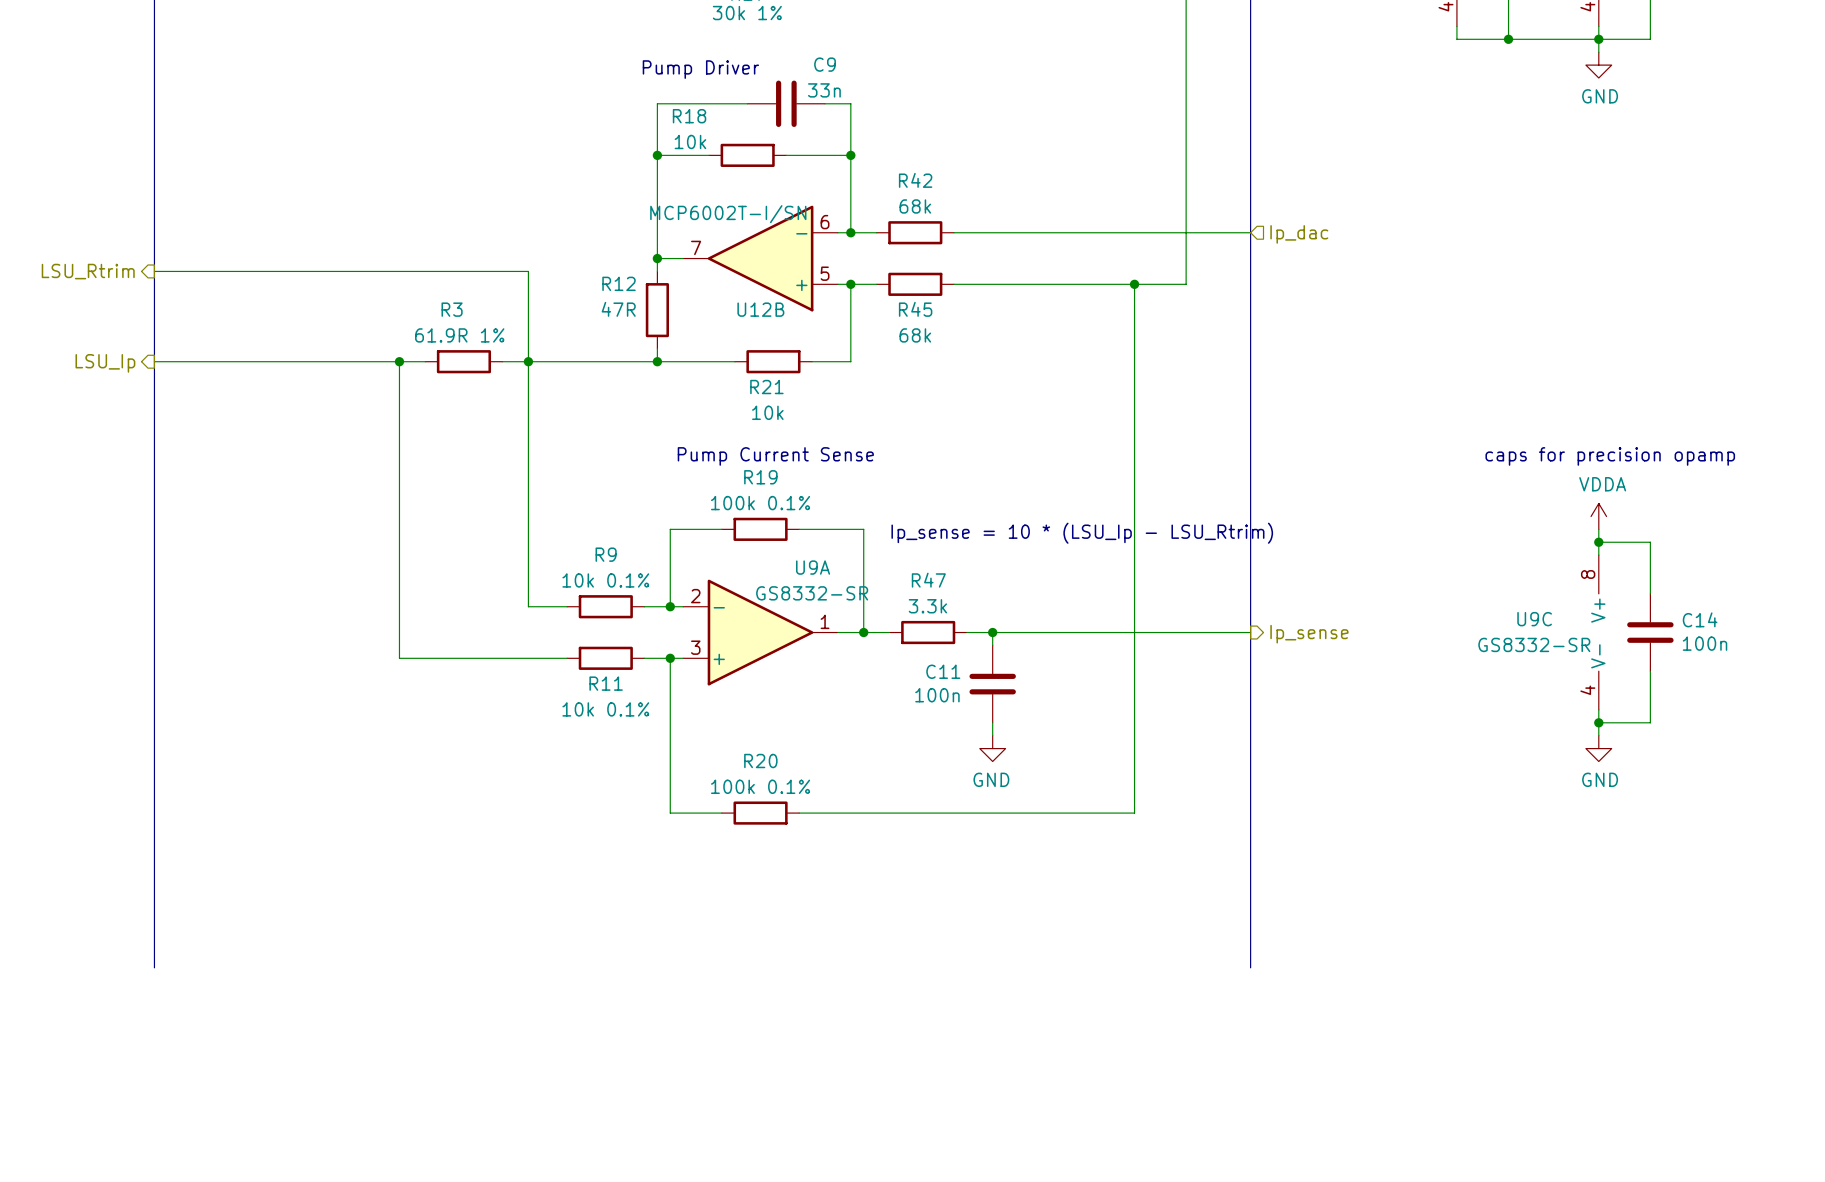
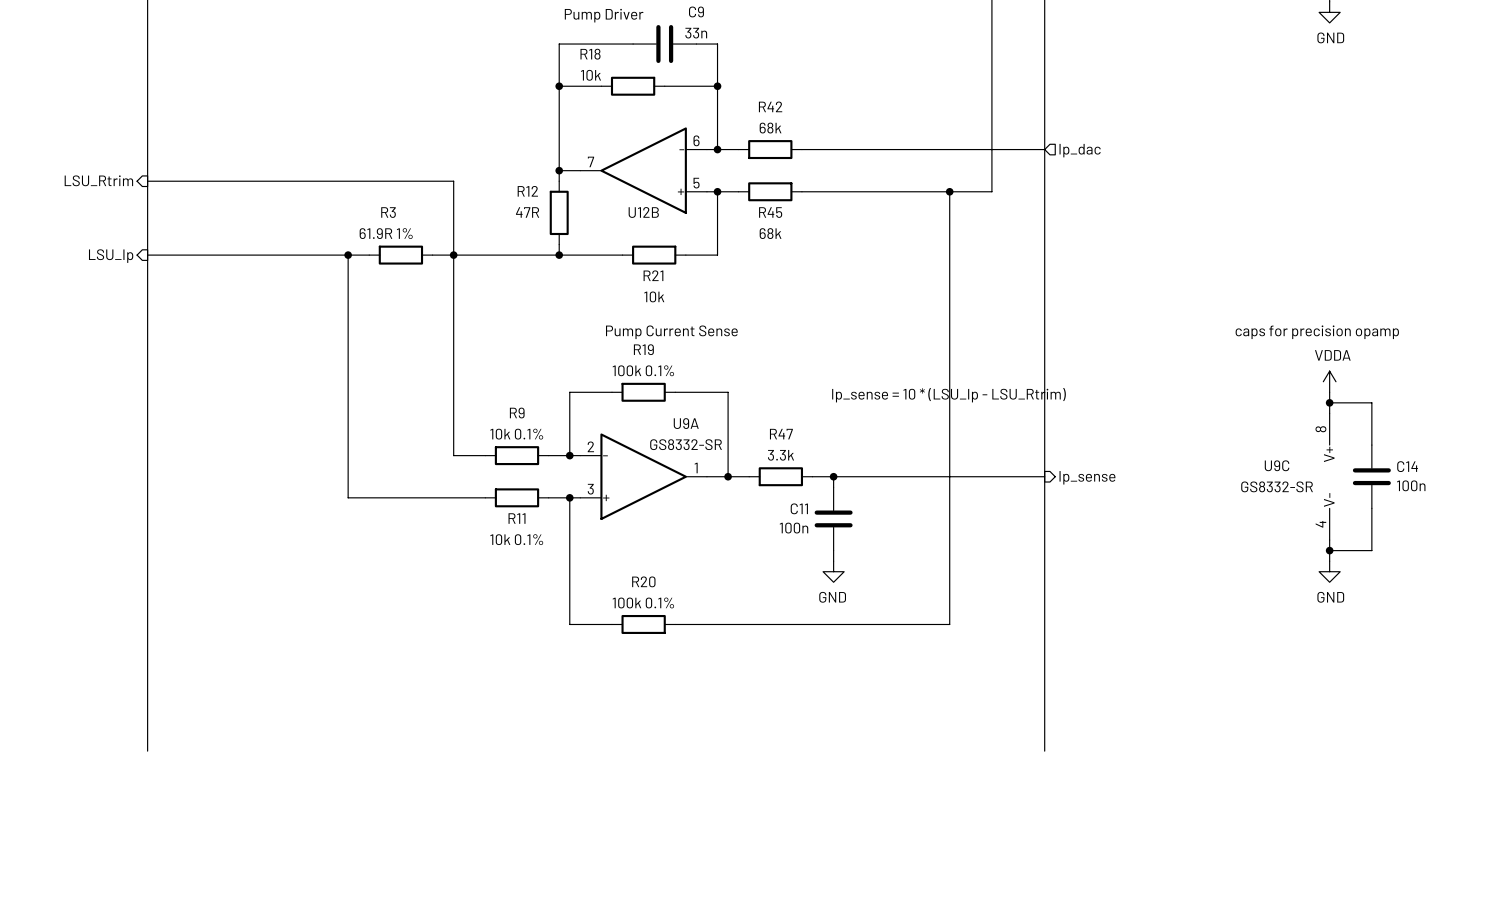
U12B value: MCP6002T-I/SN (728, 214) -> none

